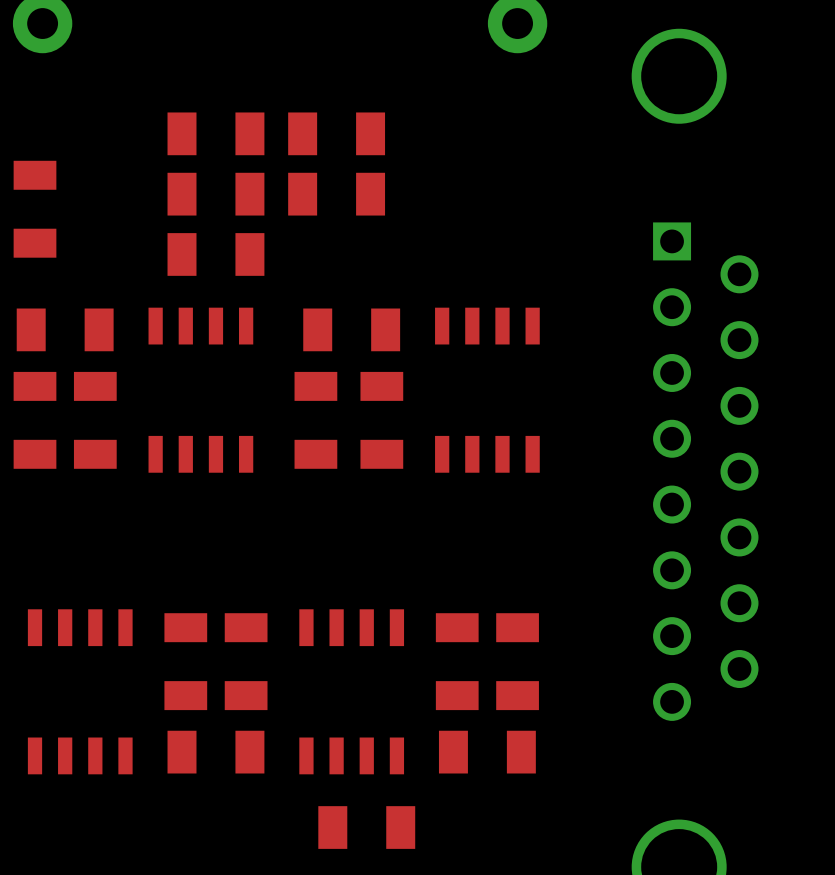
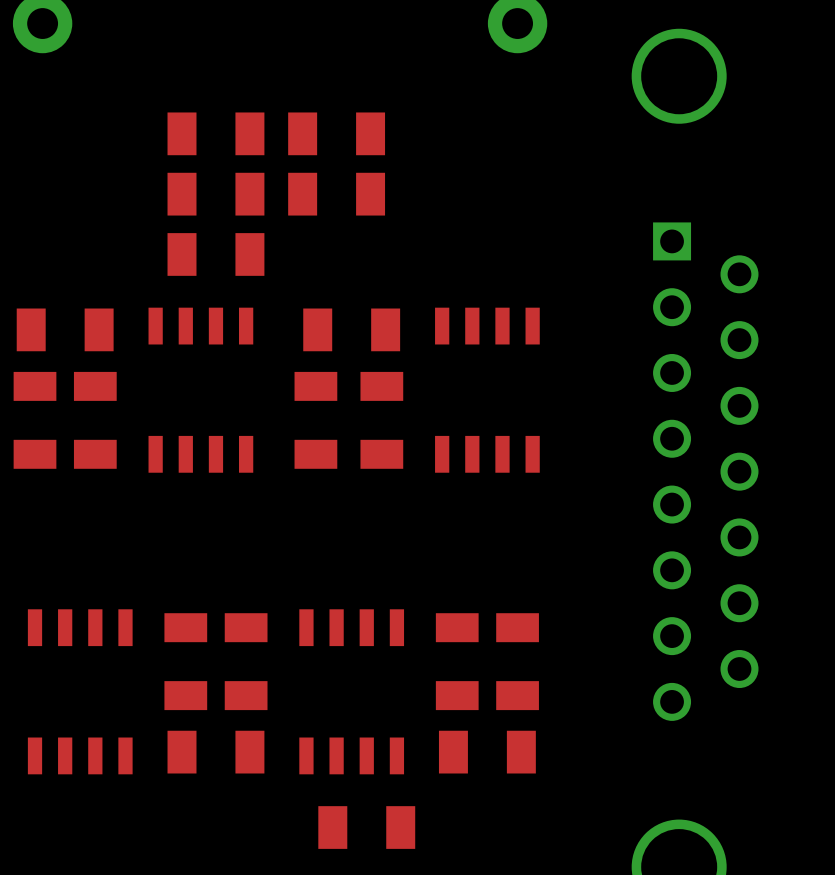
part: (35, 209) -> none

